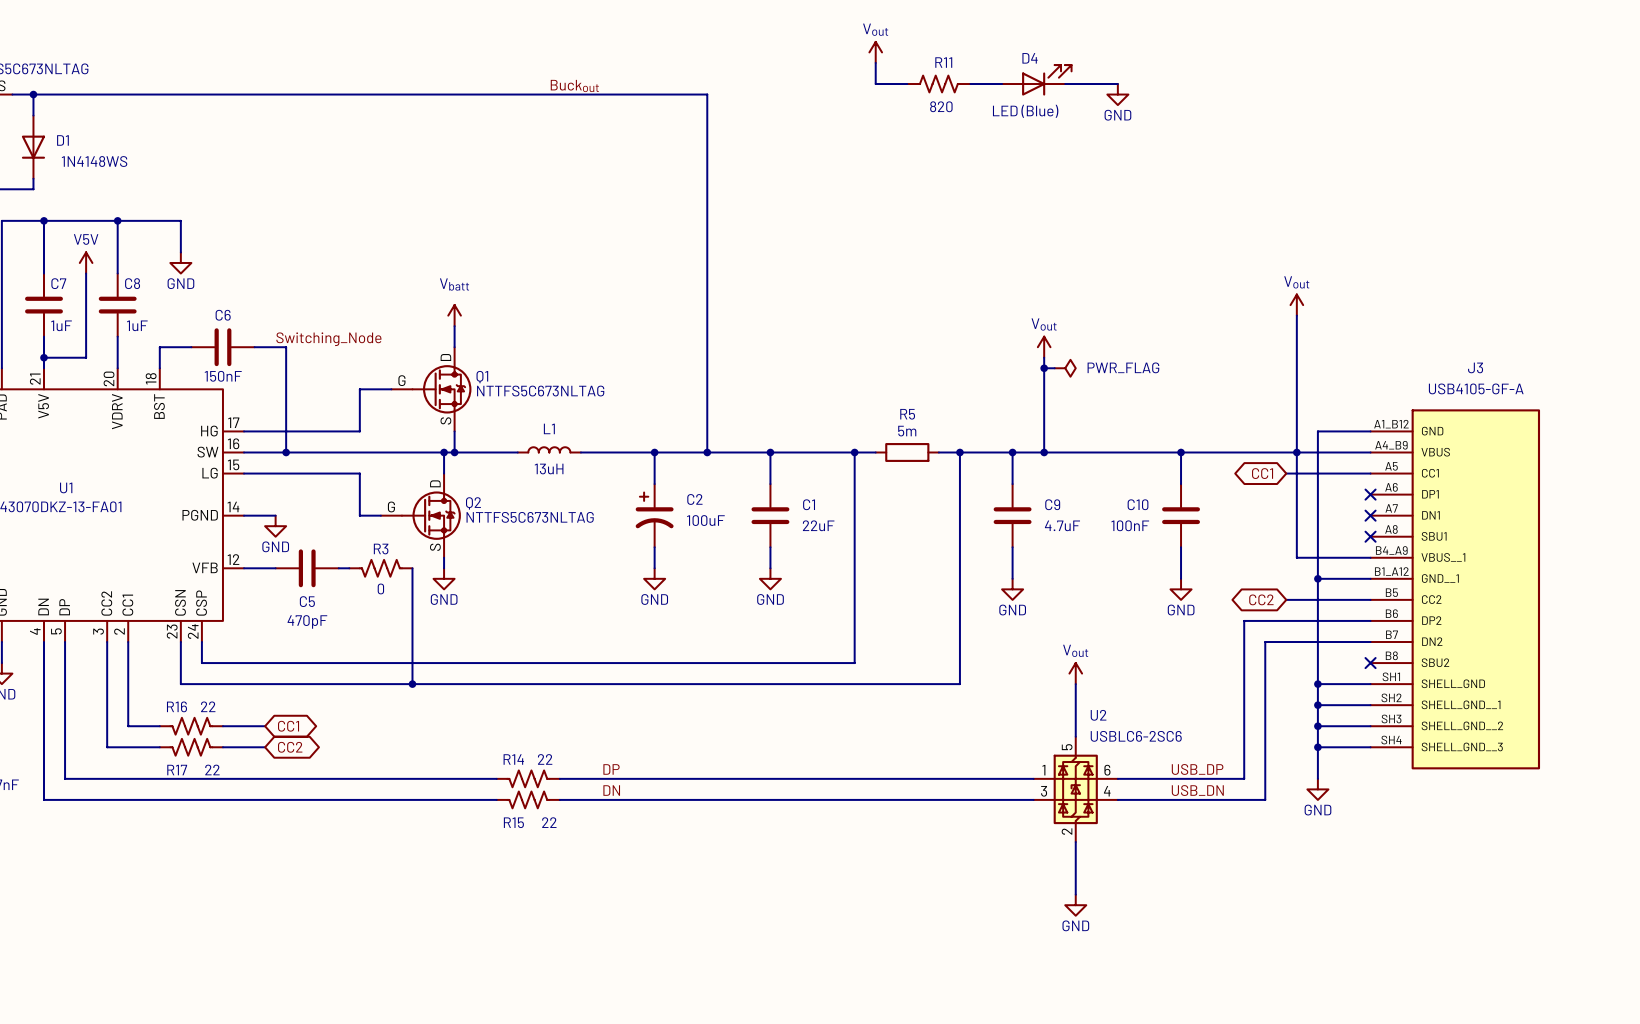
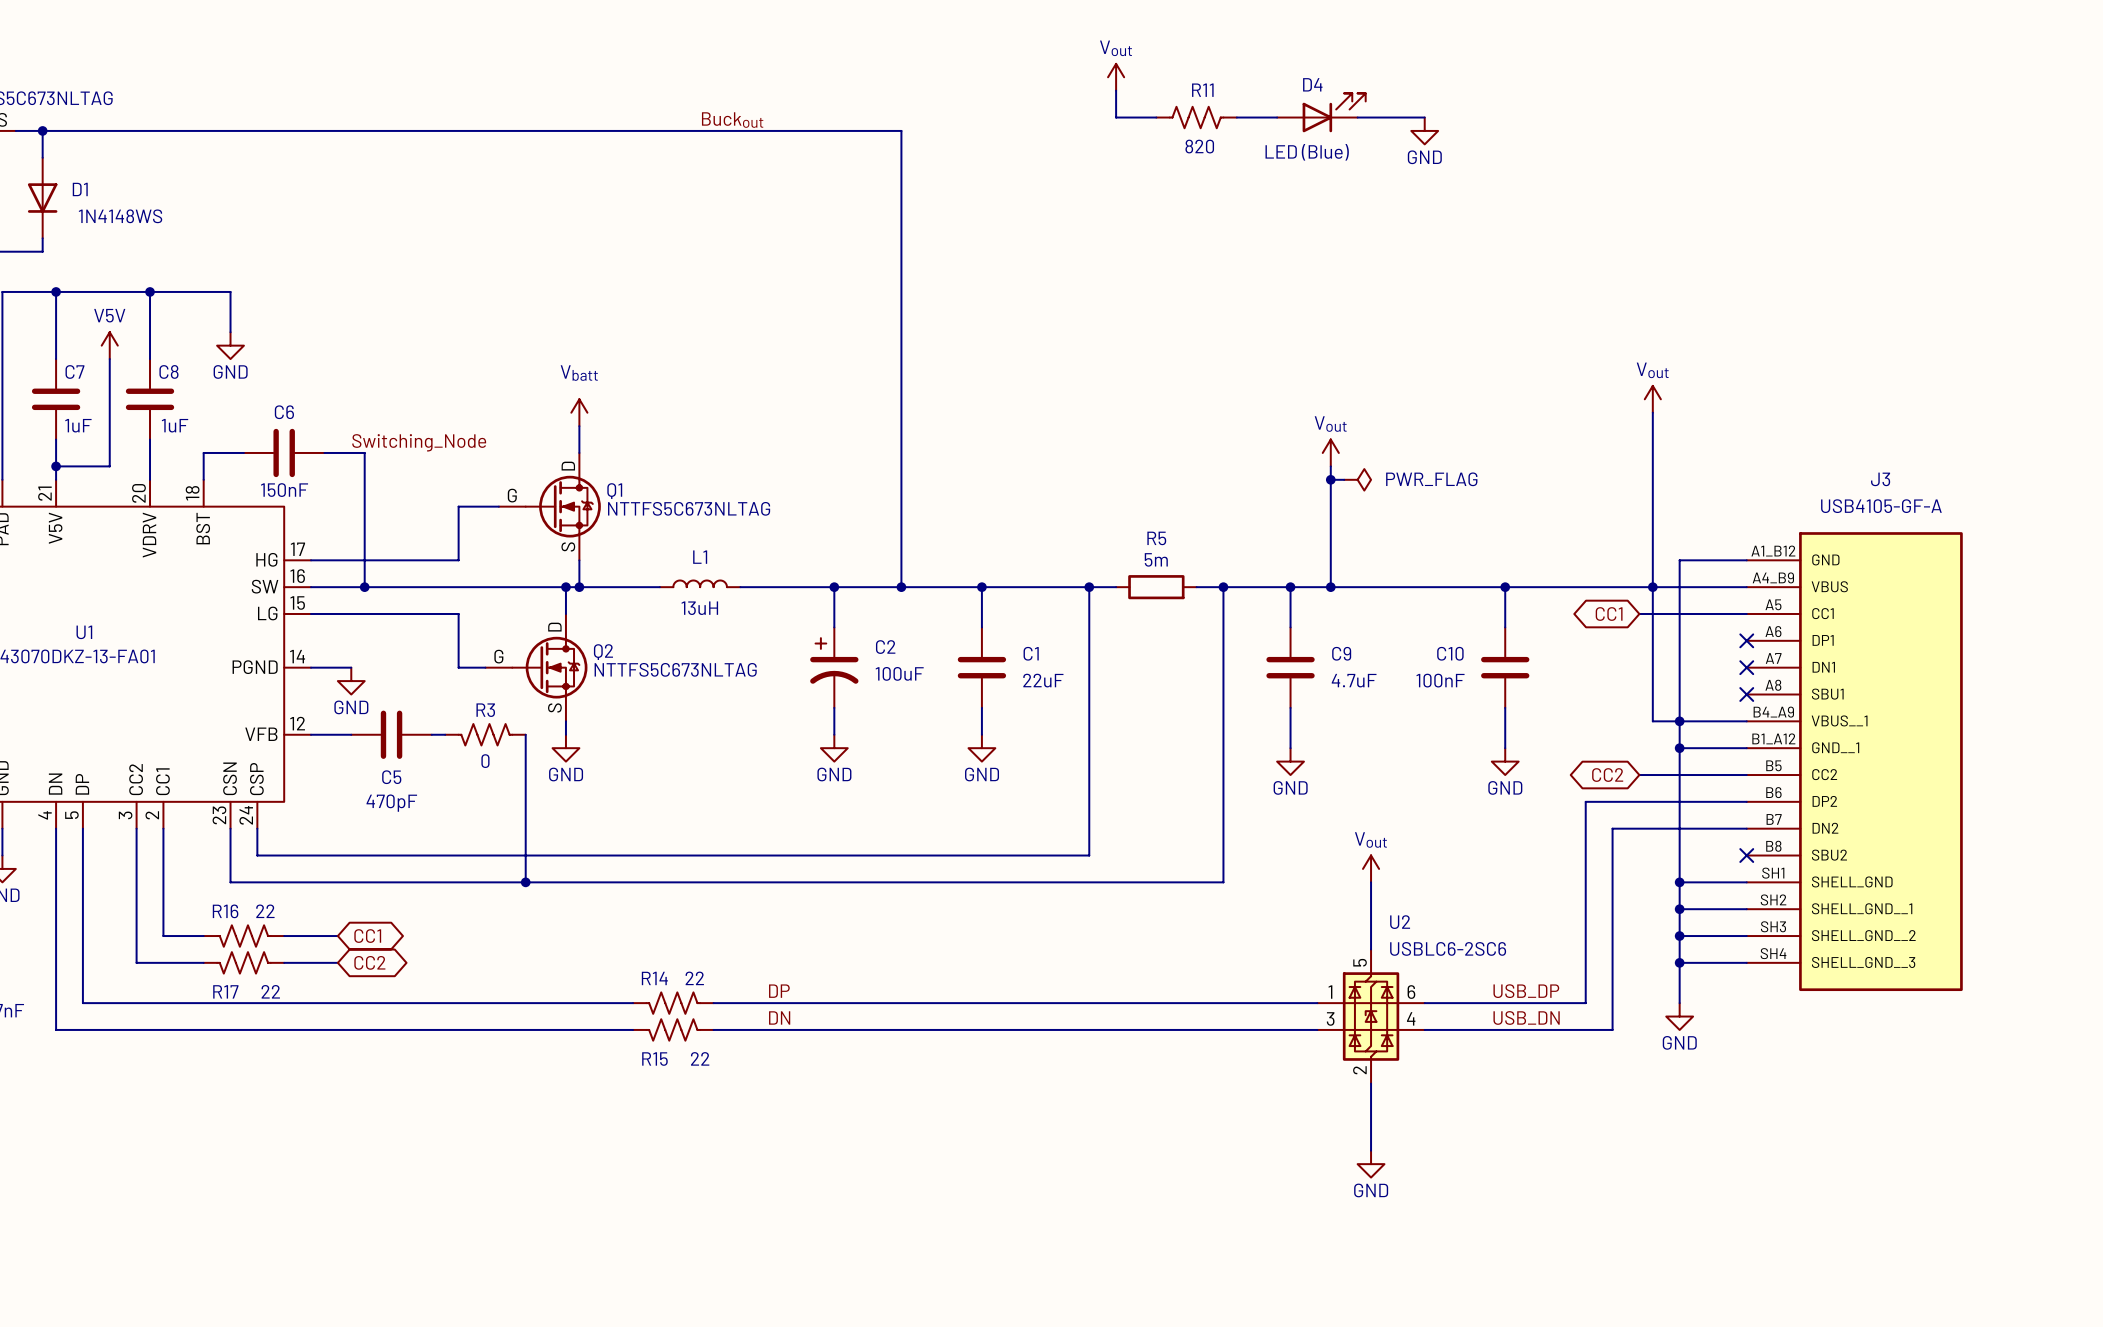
junction: none -> (1679, 721)

